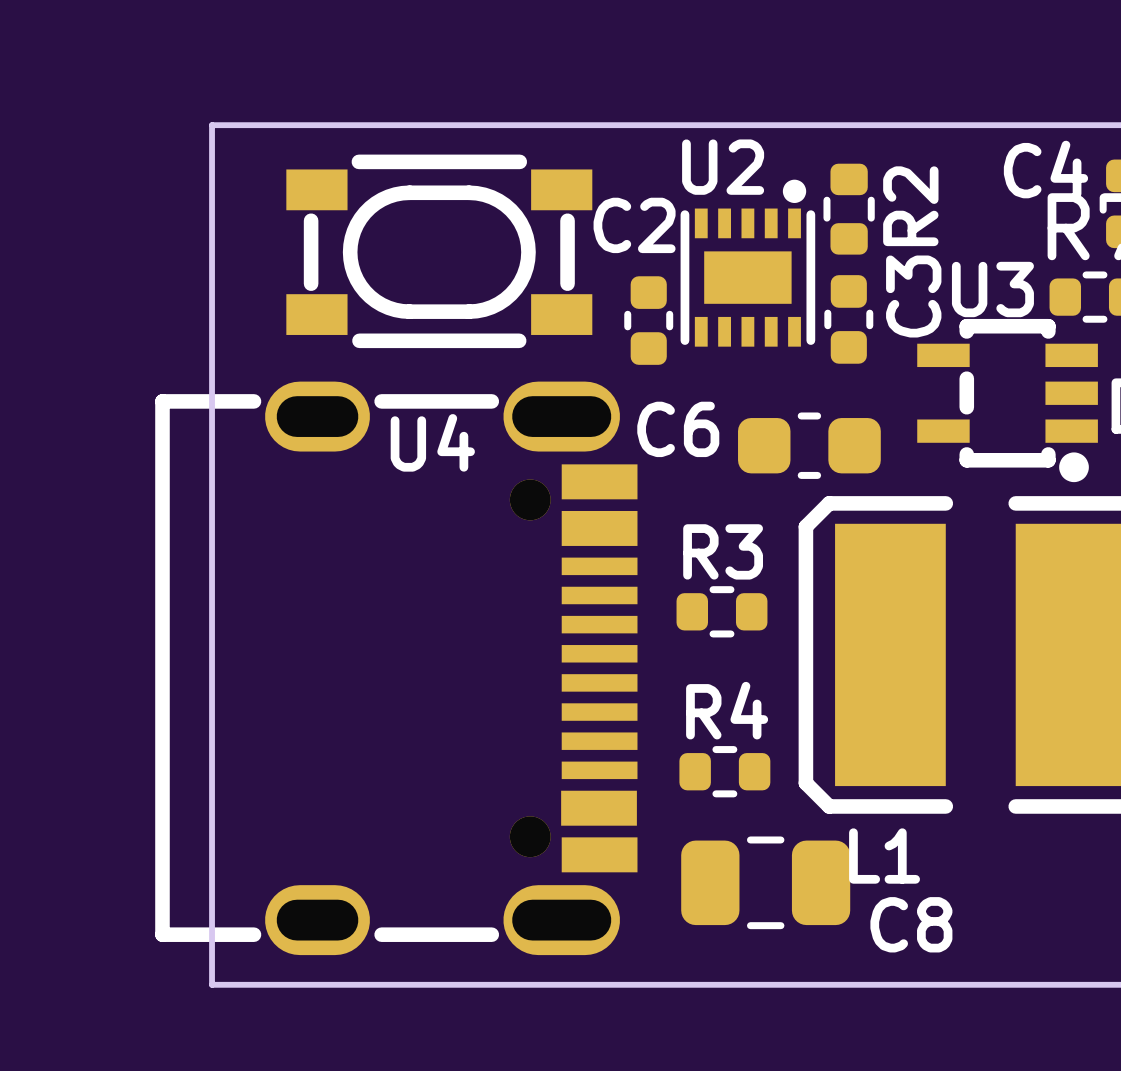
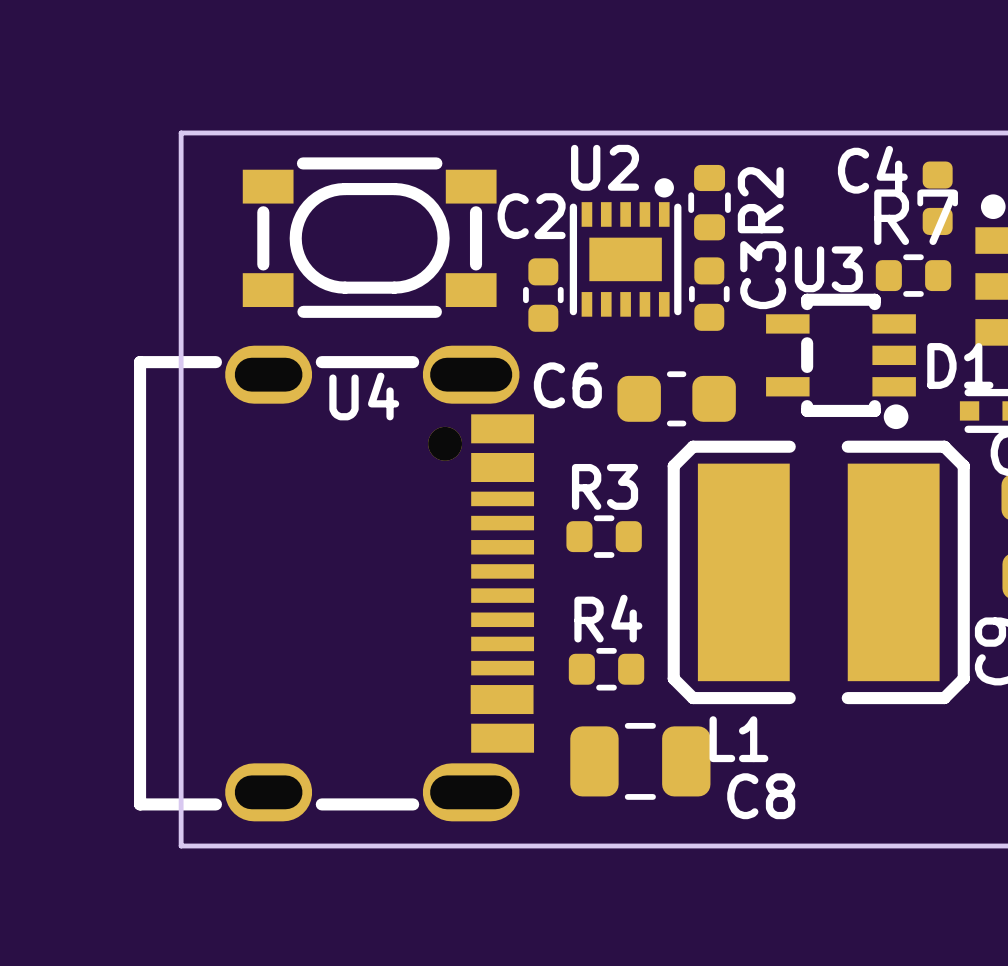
part: (530, 836) -> none

